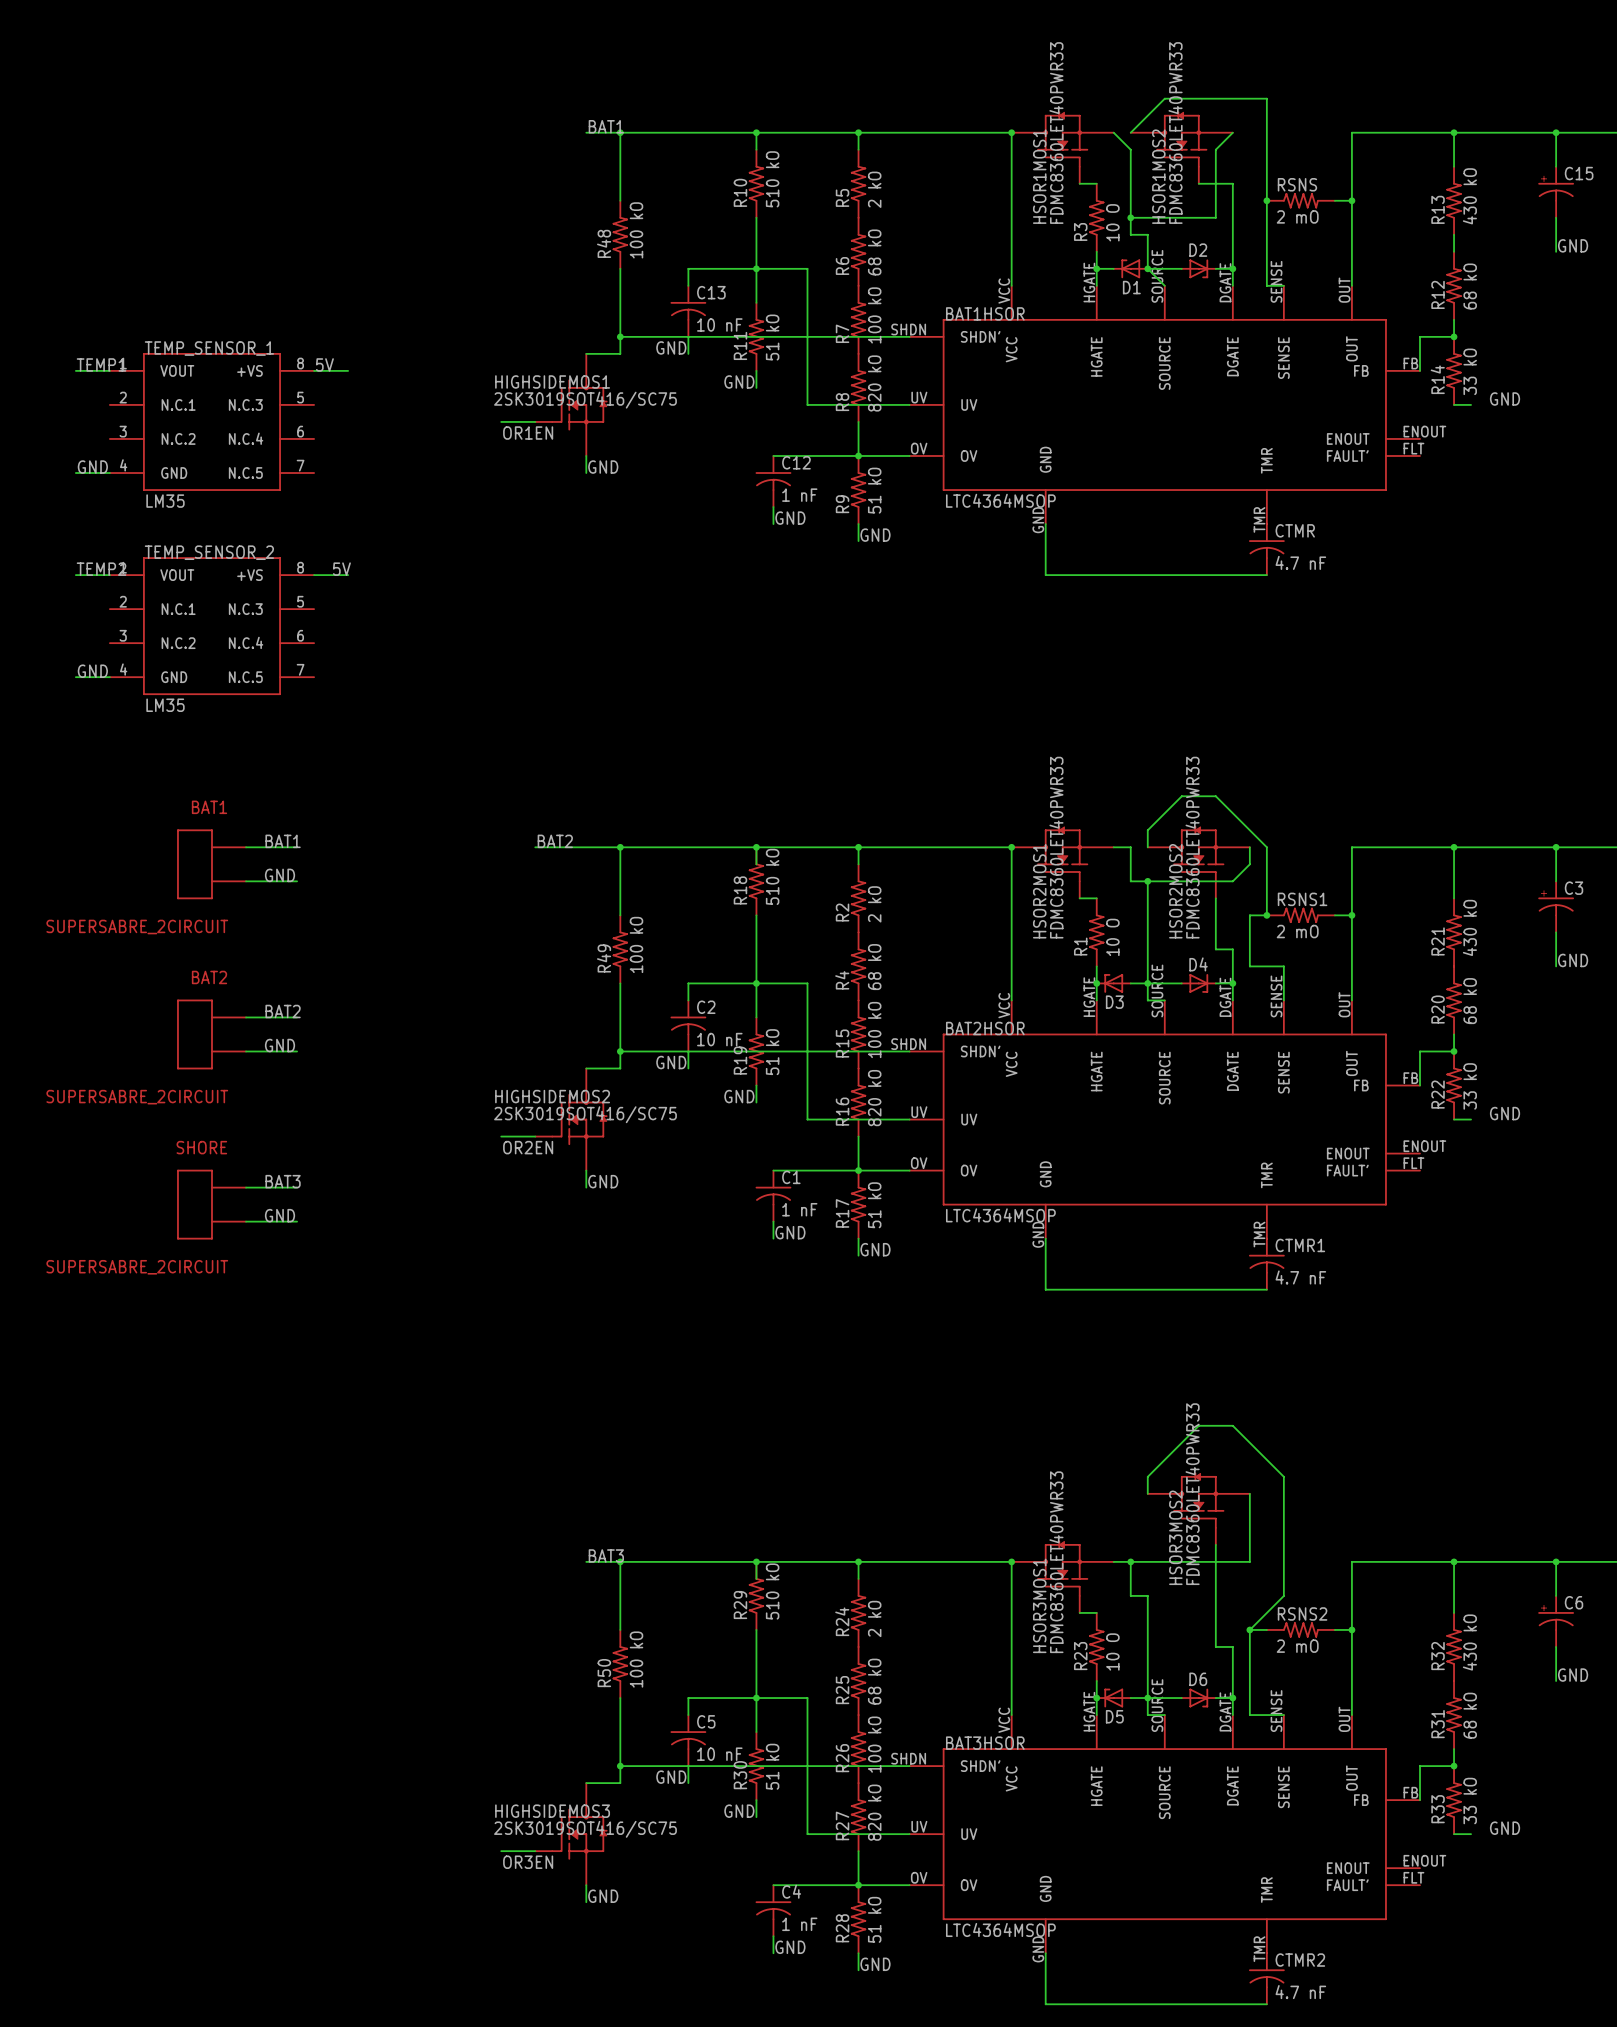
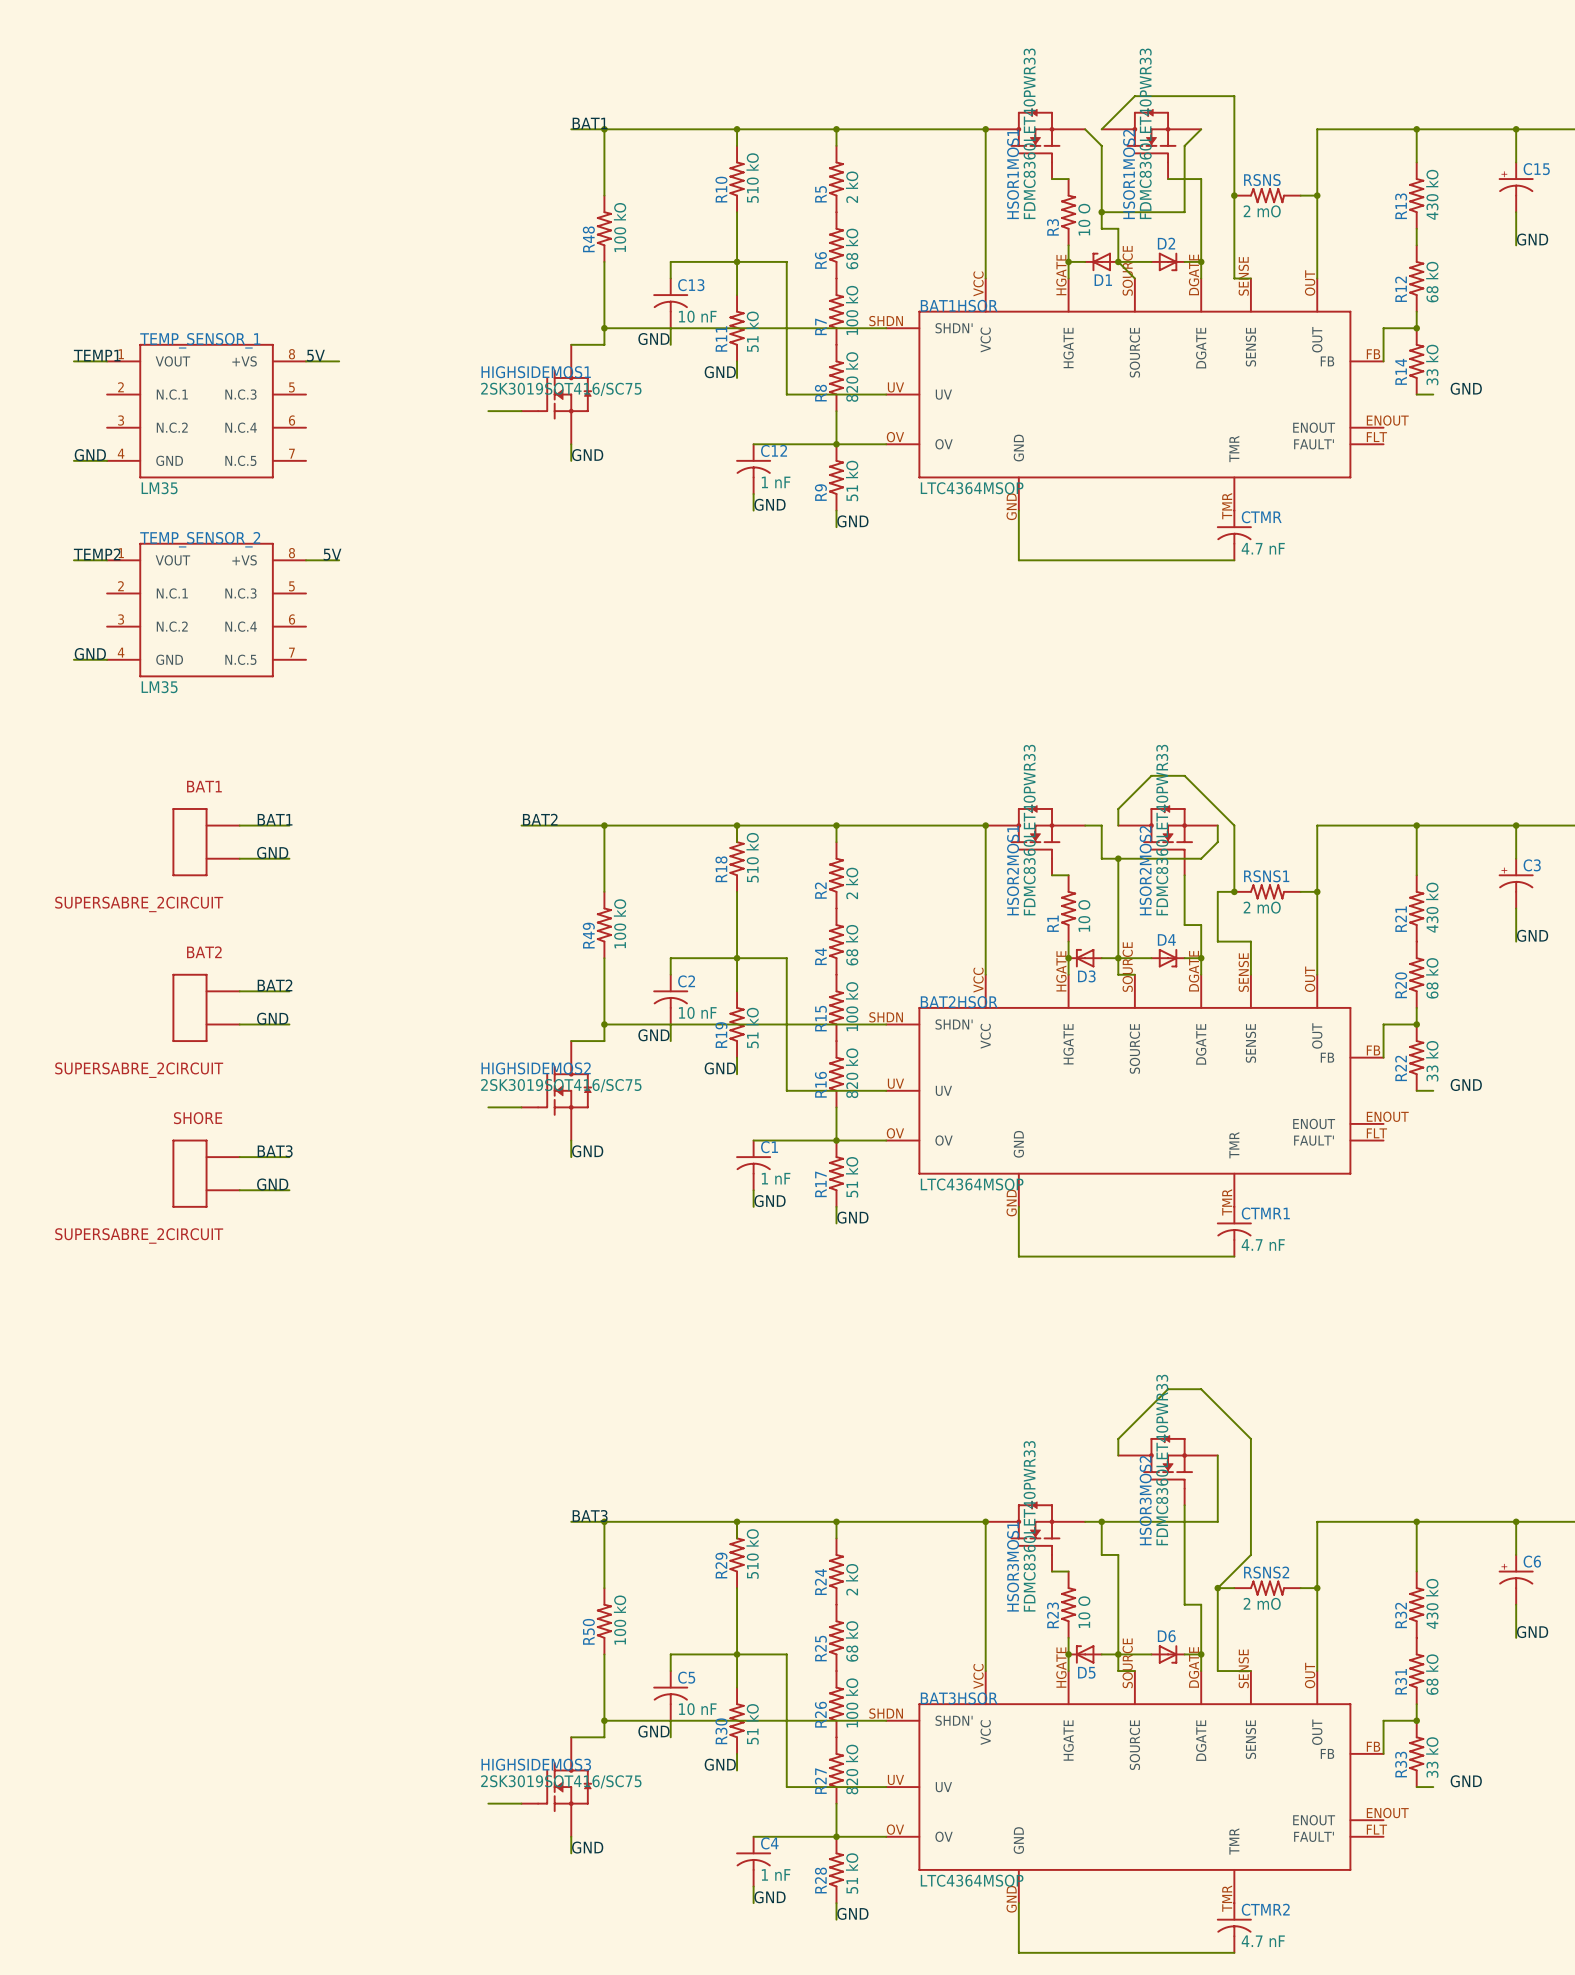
label: OR1EN (528, 433) -> none
label: OR2EN (528, 1147) -> none
label: OR3EN (528, 1862) -> none

